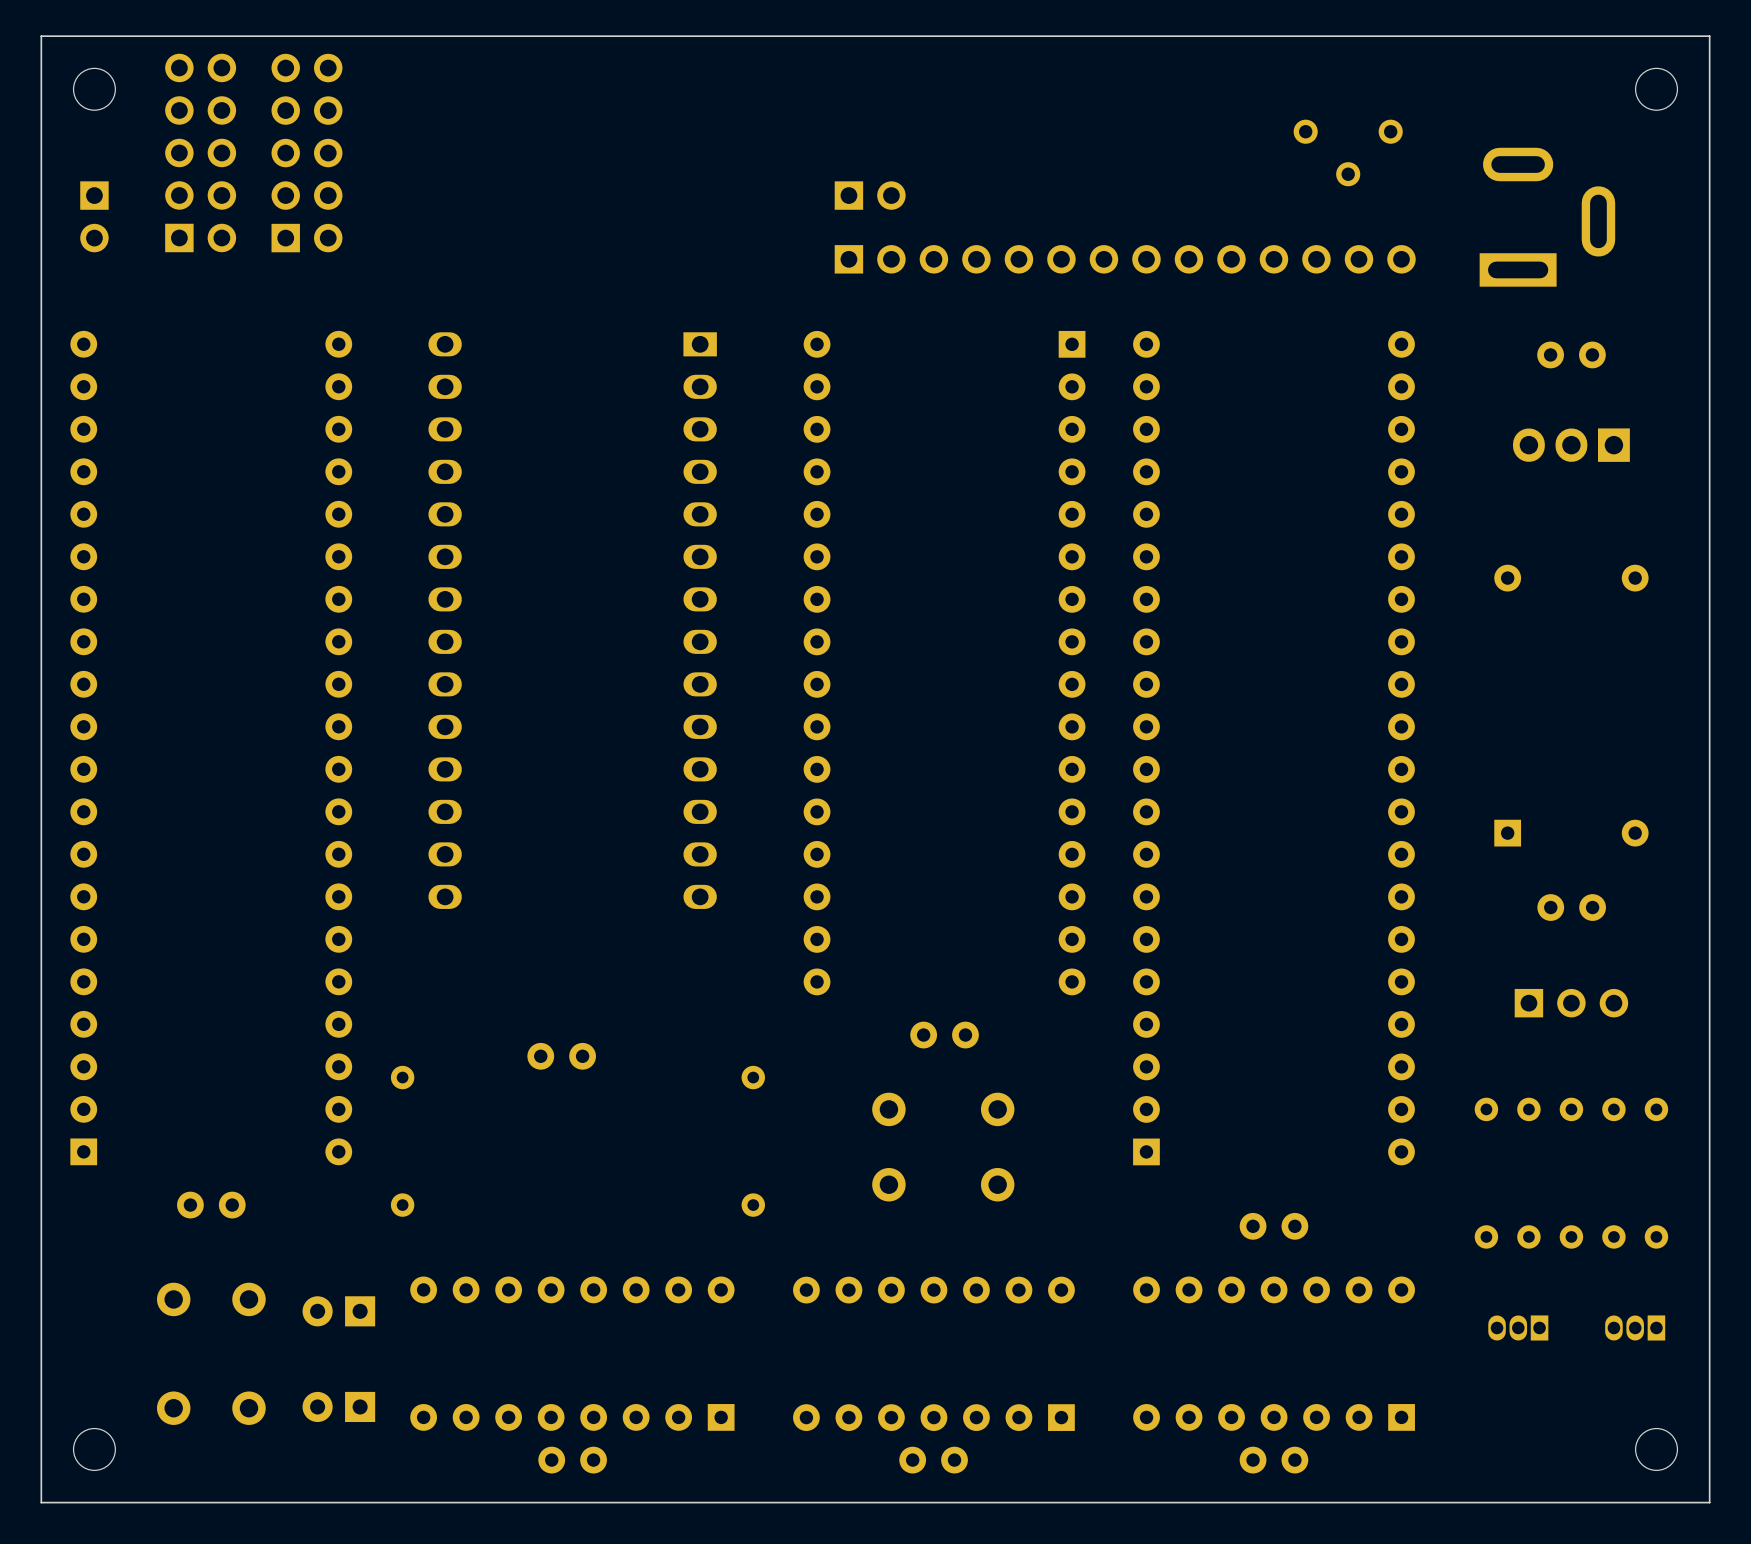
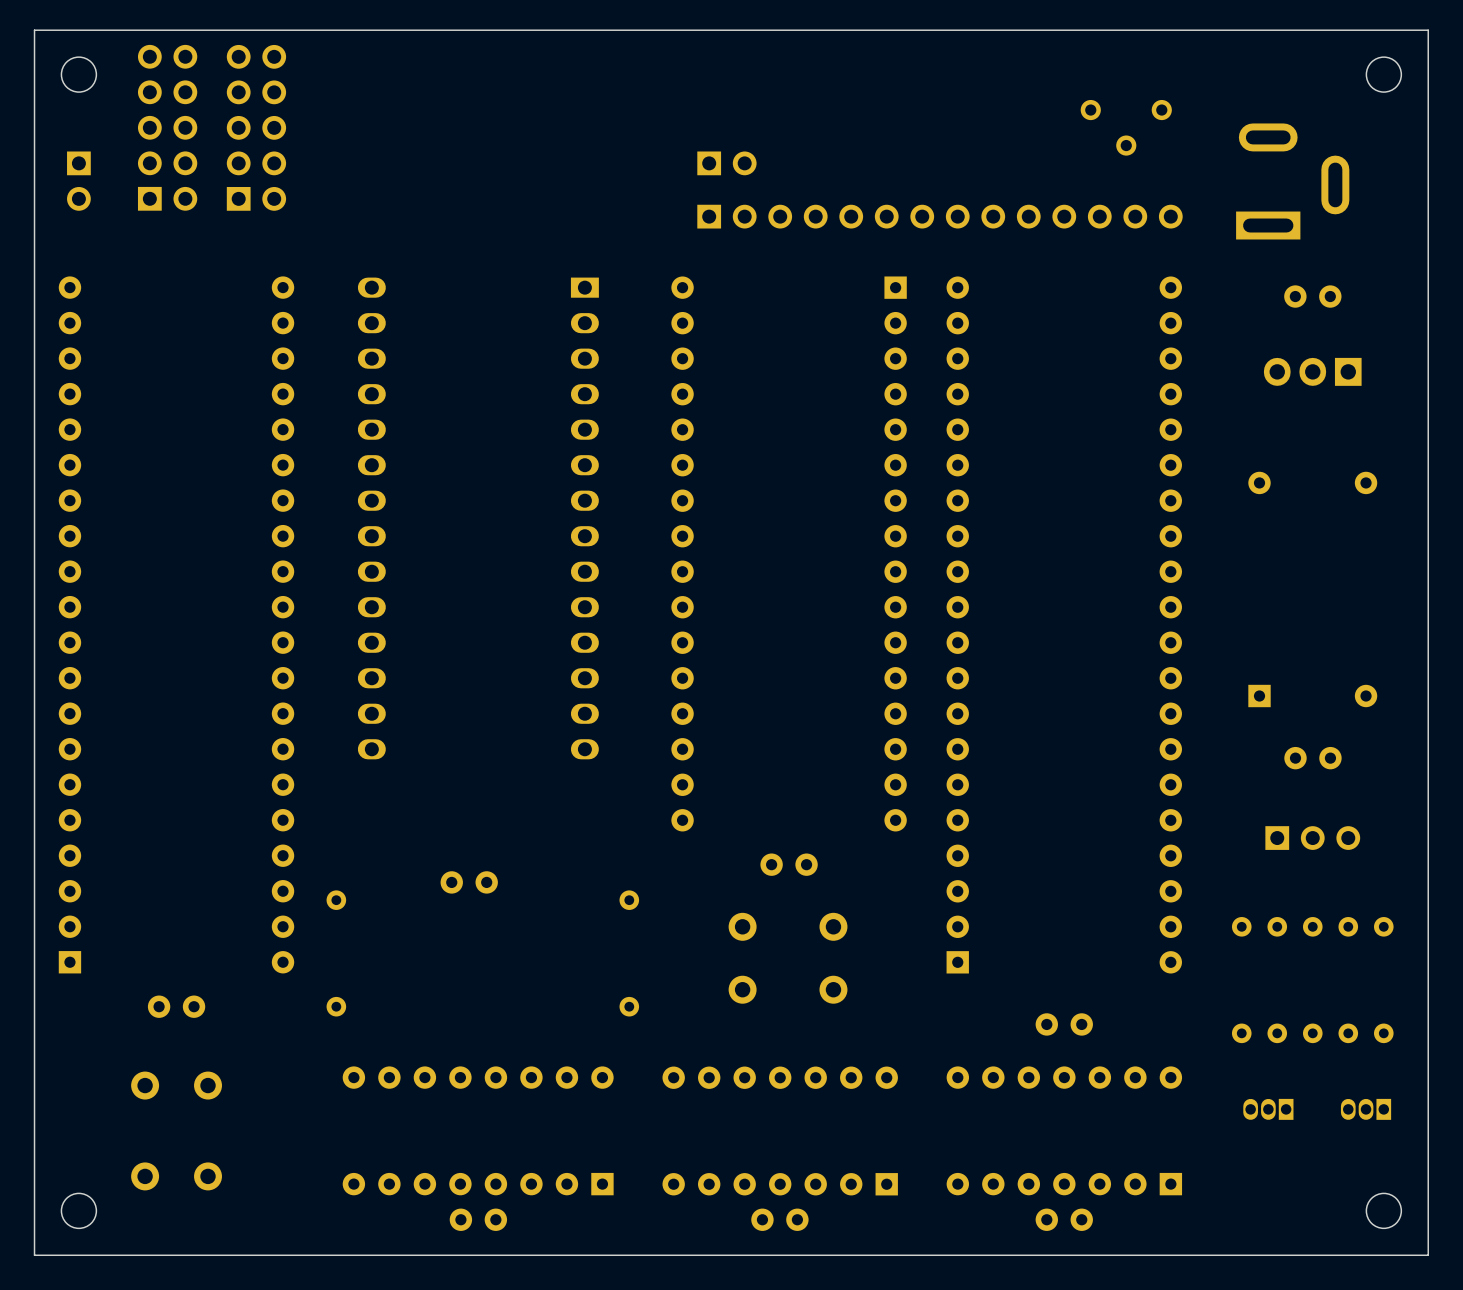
part: (338, 1311) -> none
part: (338, 1406) -> none

